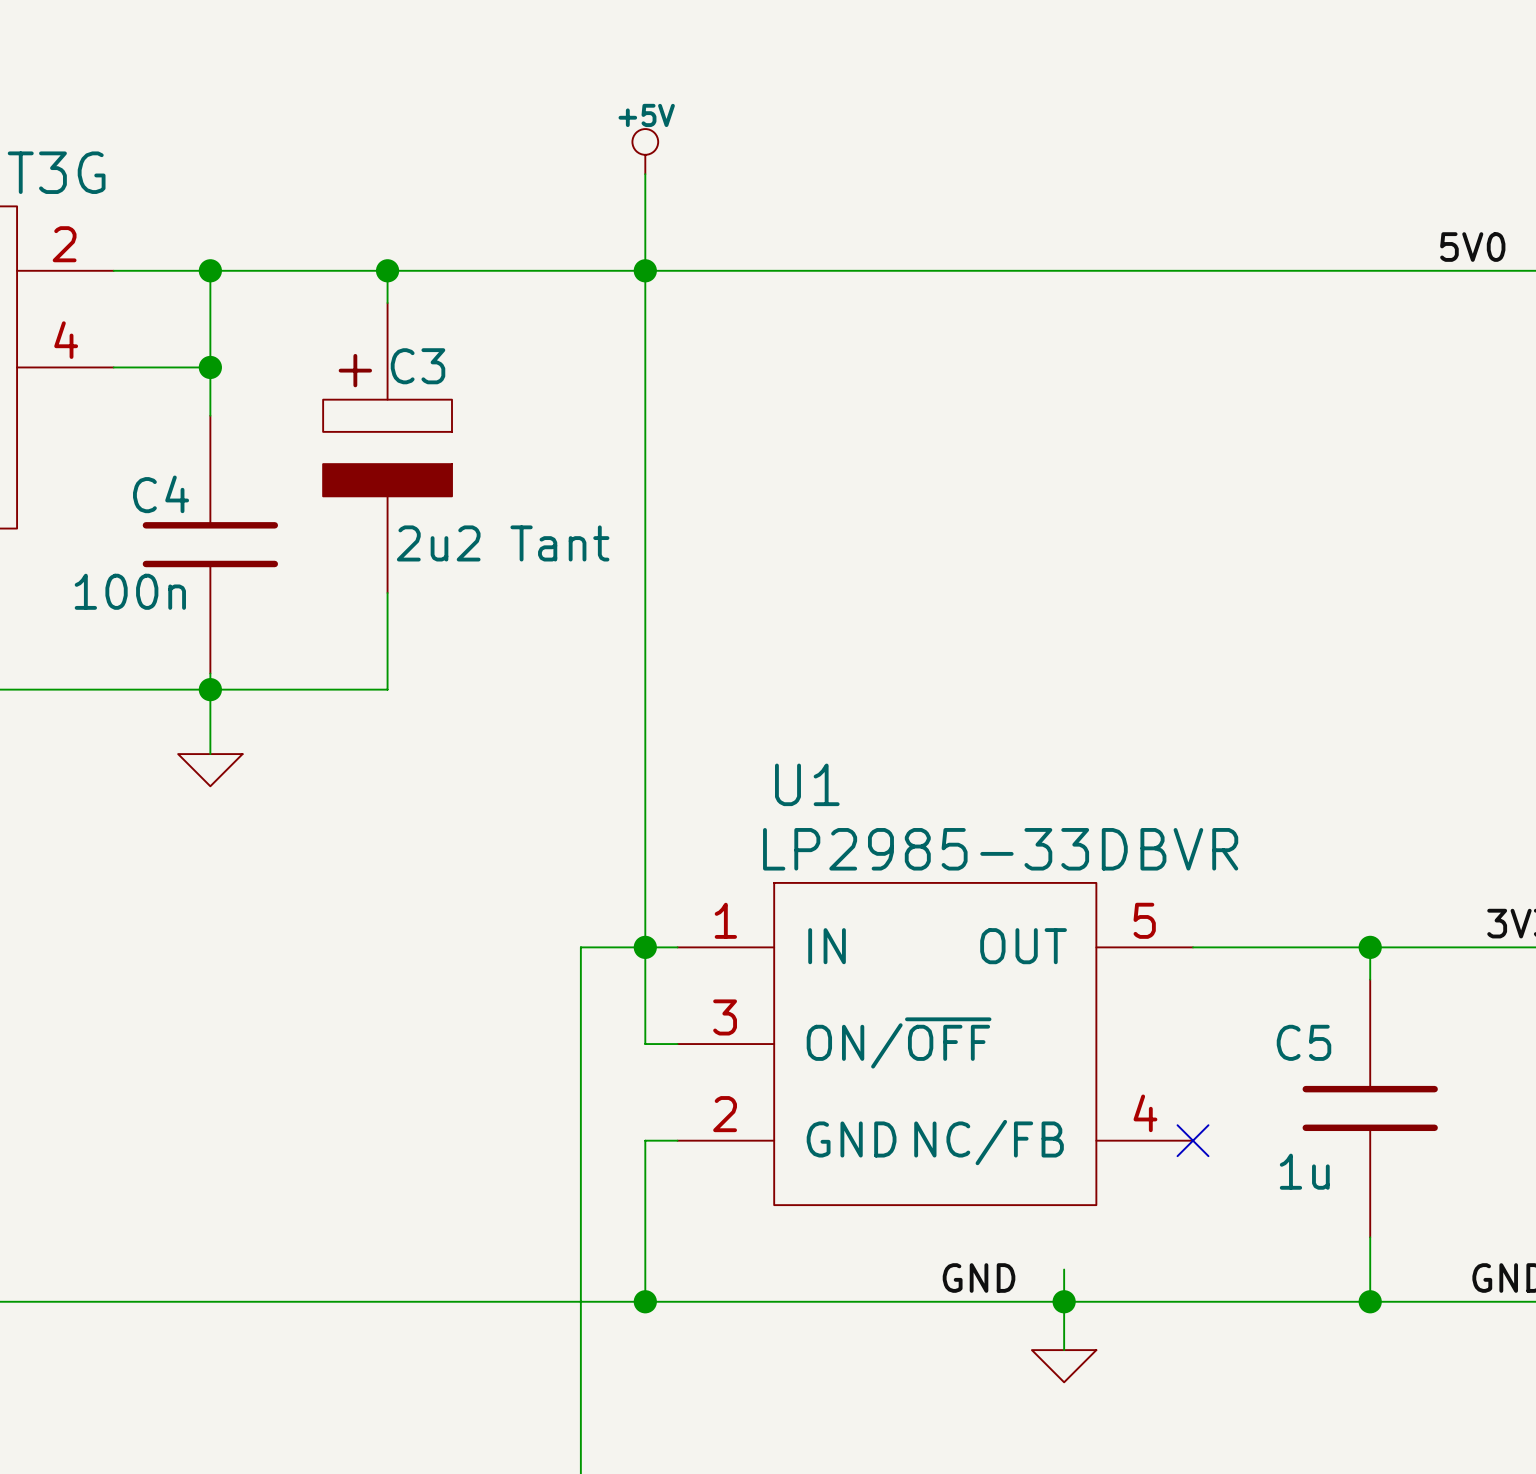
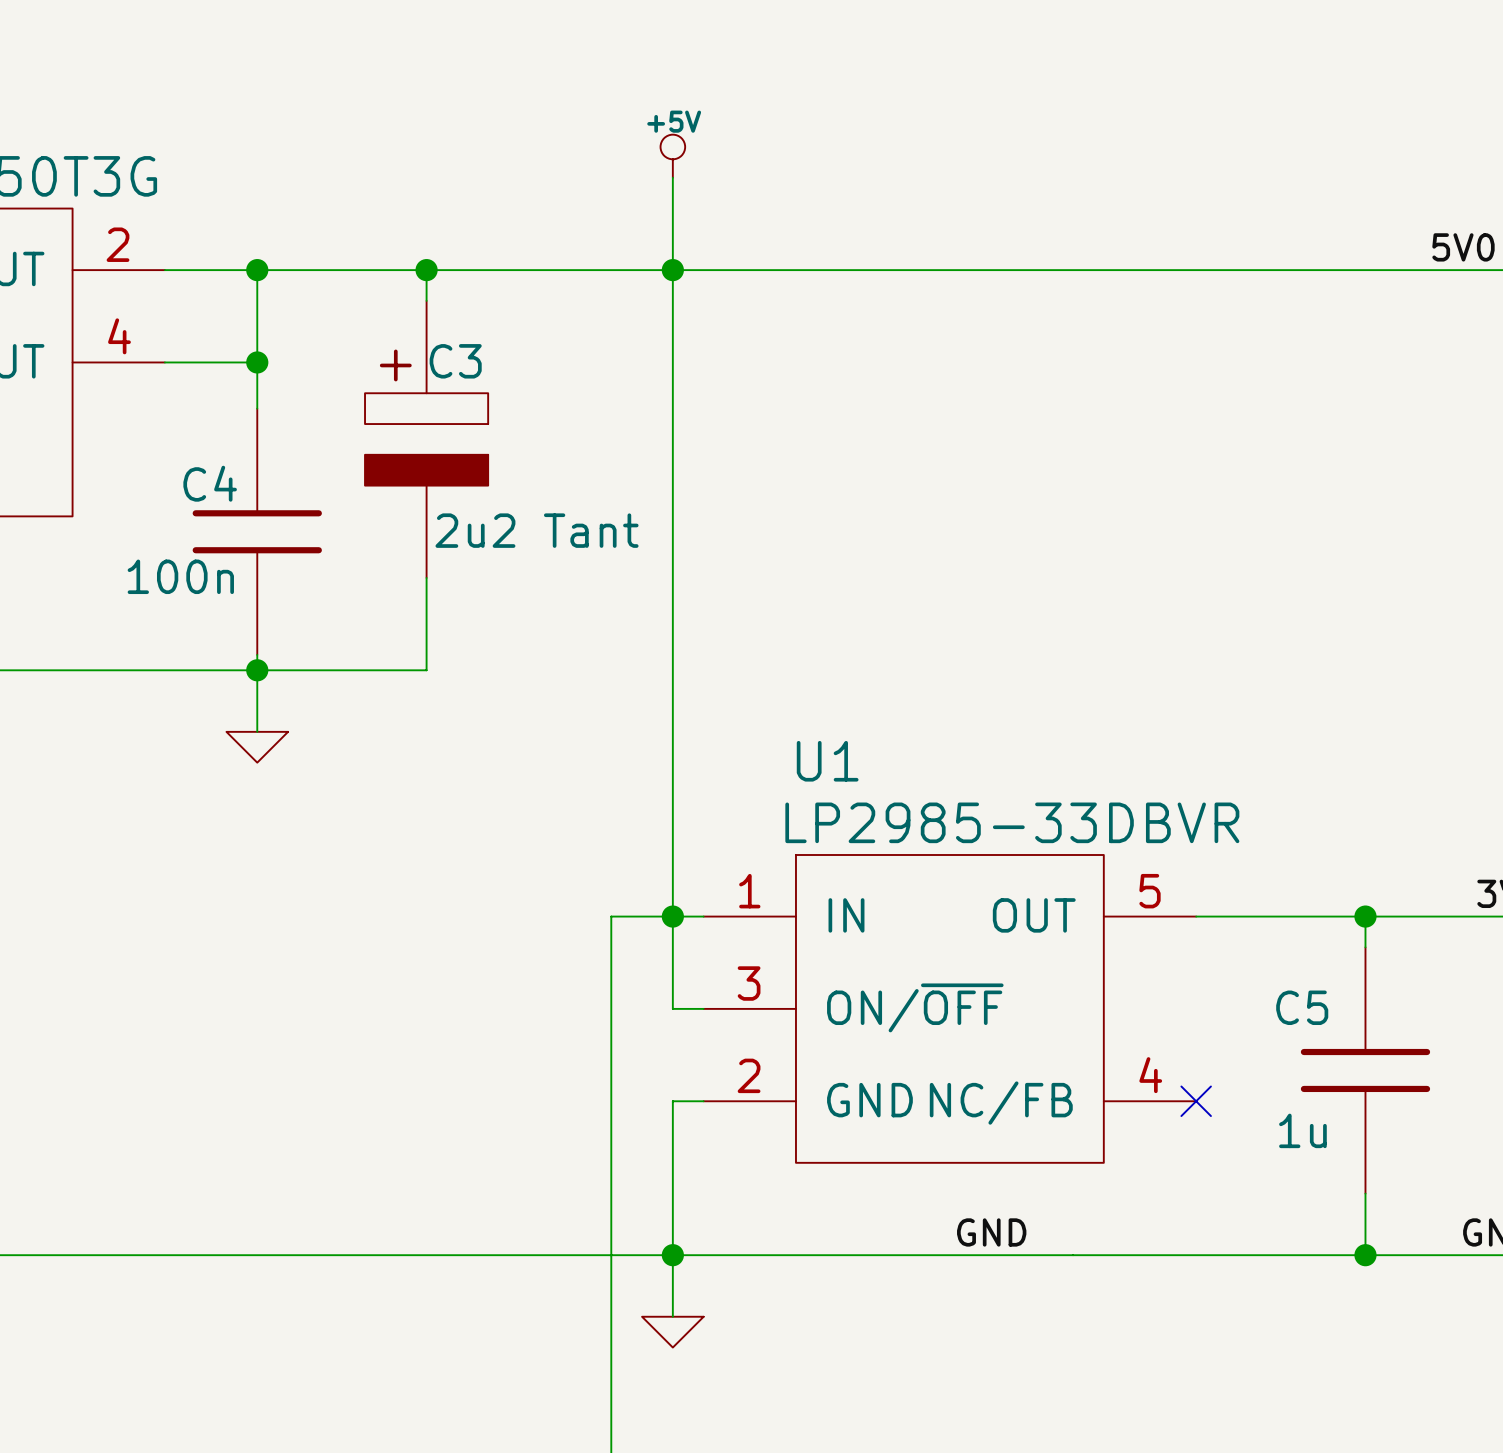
wire: (1064, 1269) (1064, 1350) -> none
wire: none -> (672, 1255) (672, 1316)
junction: (1064, 1301) -> none
power symbol position: (1064, 1366) -> (672, 1332)

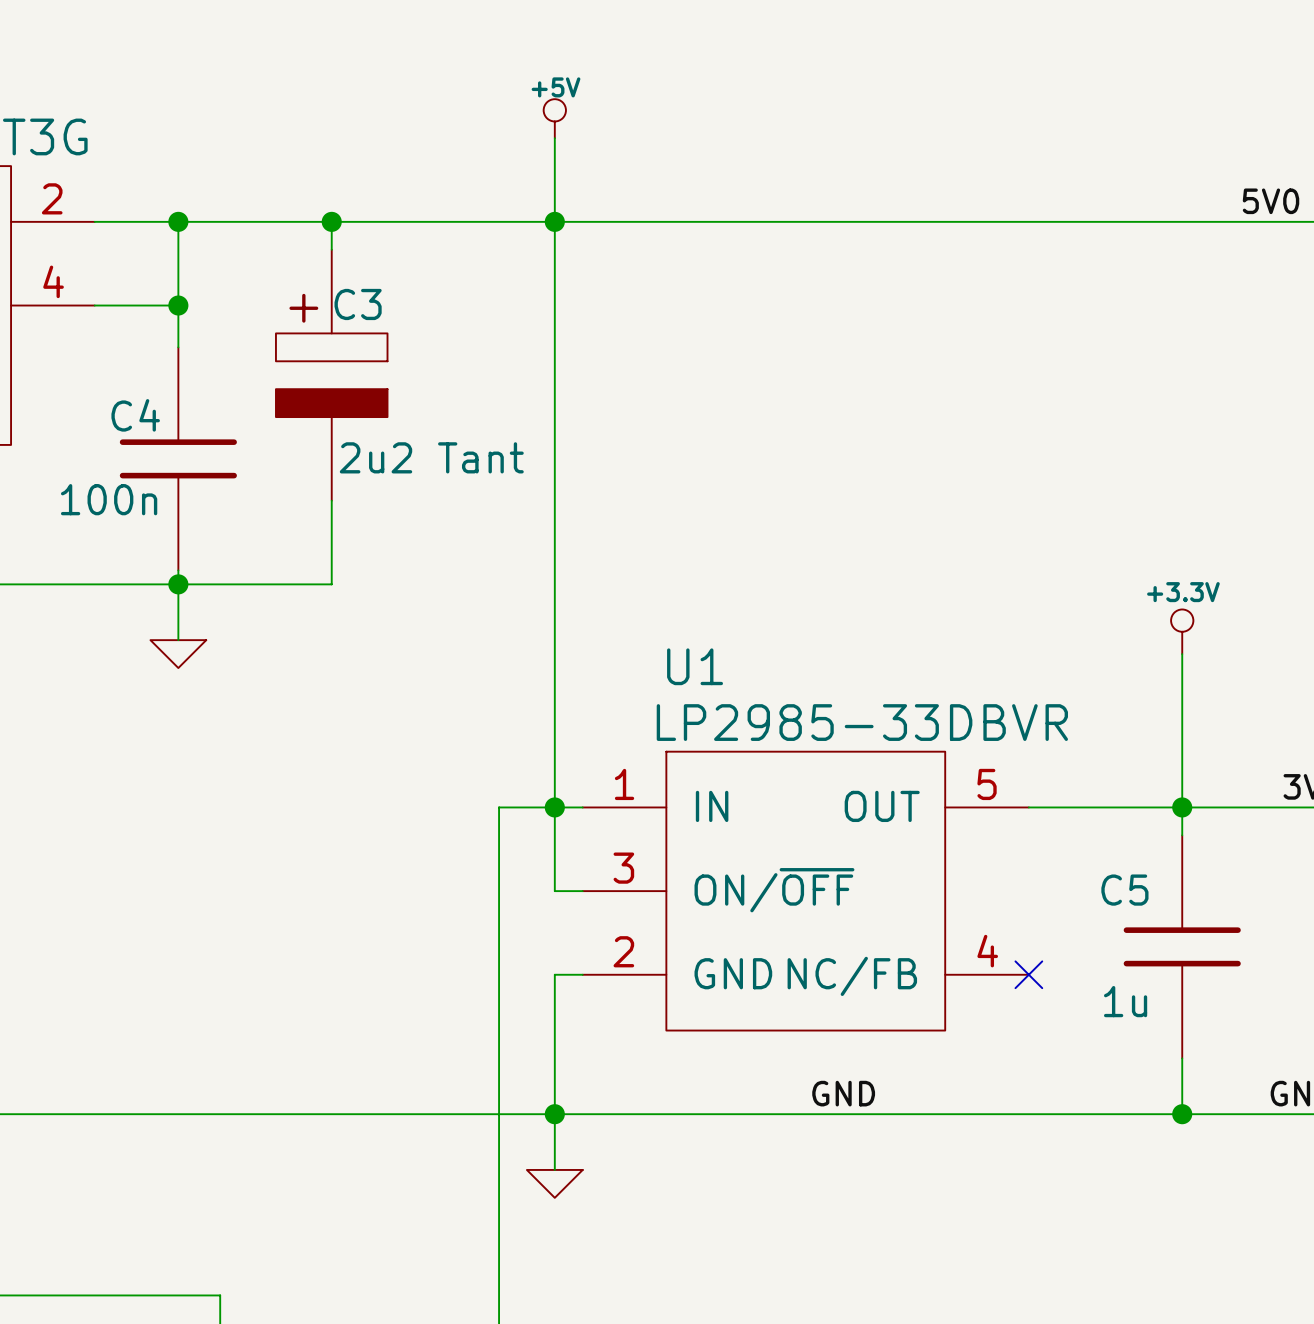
power symbol: none -> +3.3V (1182, 631)
wire: none -> (1182, 654) (1182, 807)

